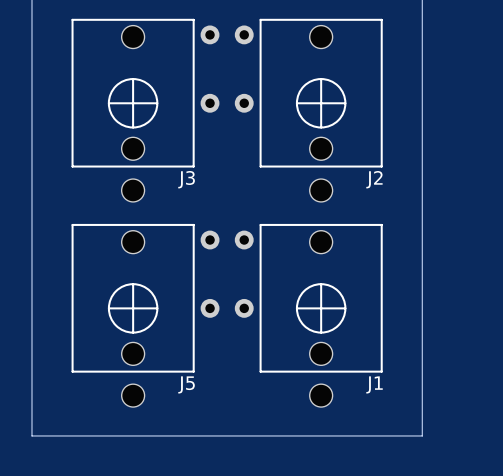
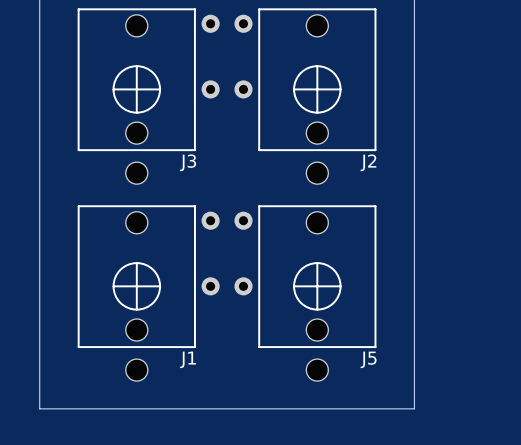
J5 name: J5 (186, 384) -> J1 (188, 359)
J1 name: J1 (374, 384) -> J5 (368, 359)

